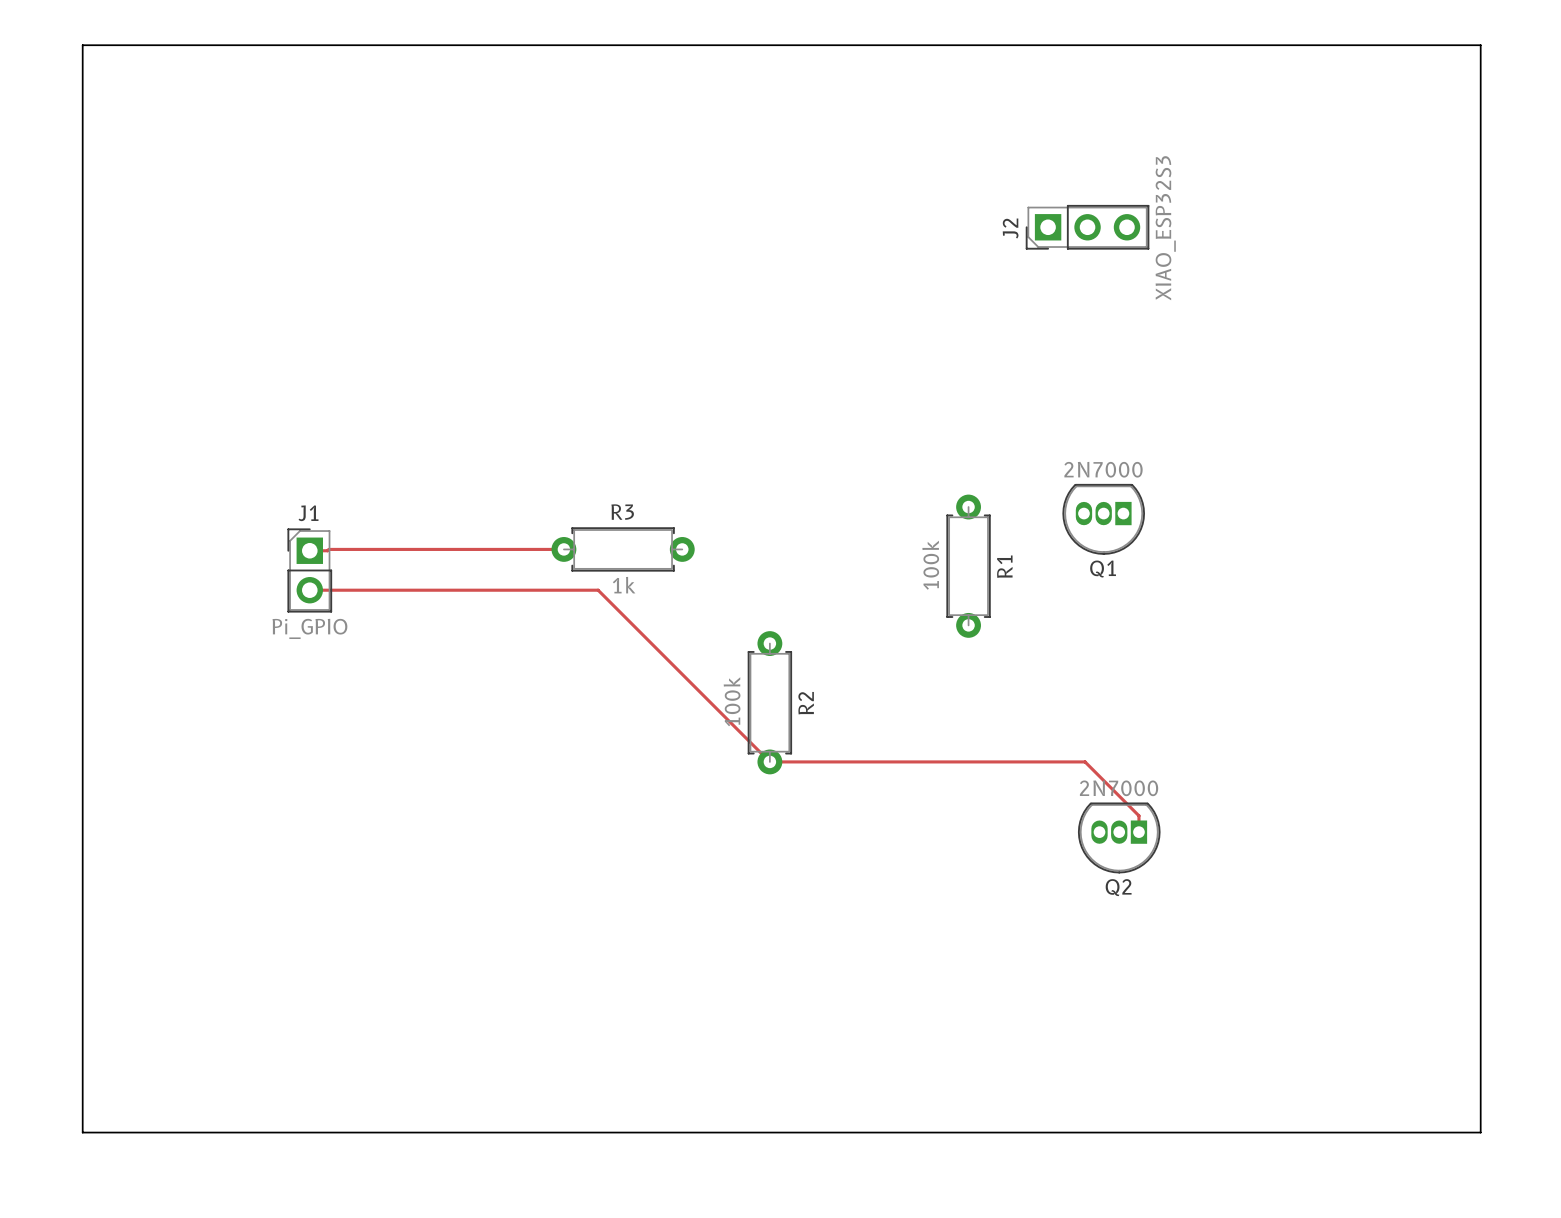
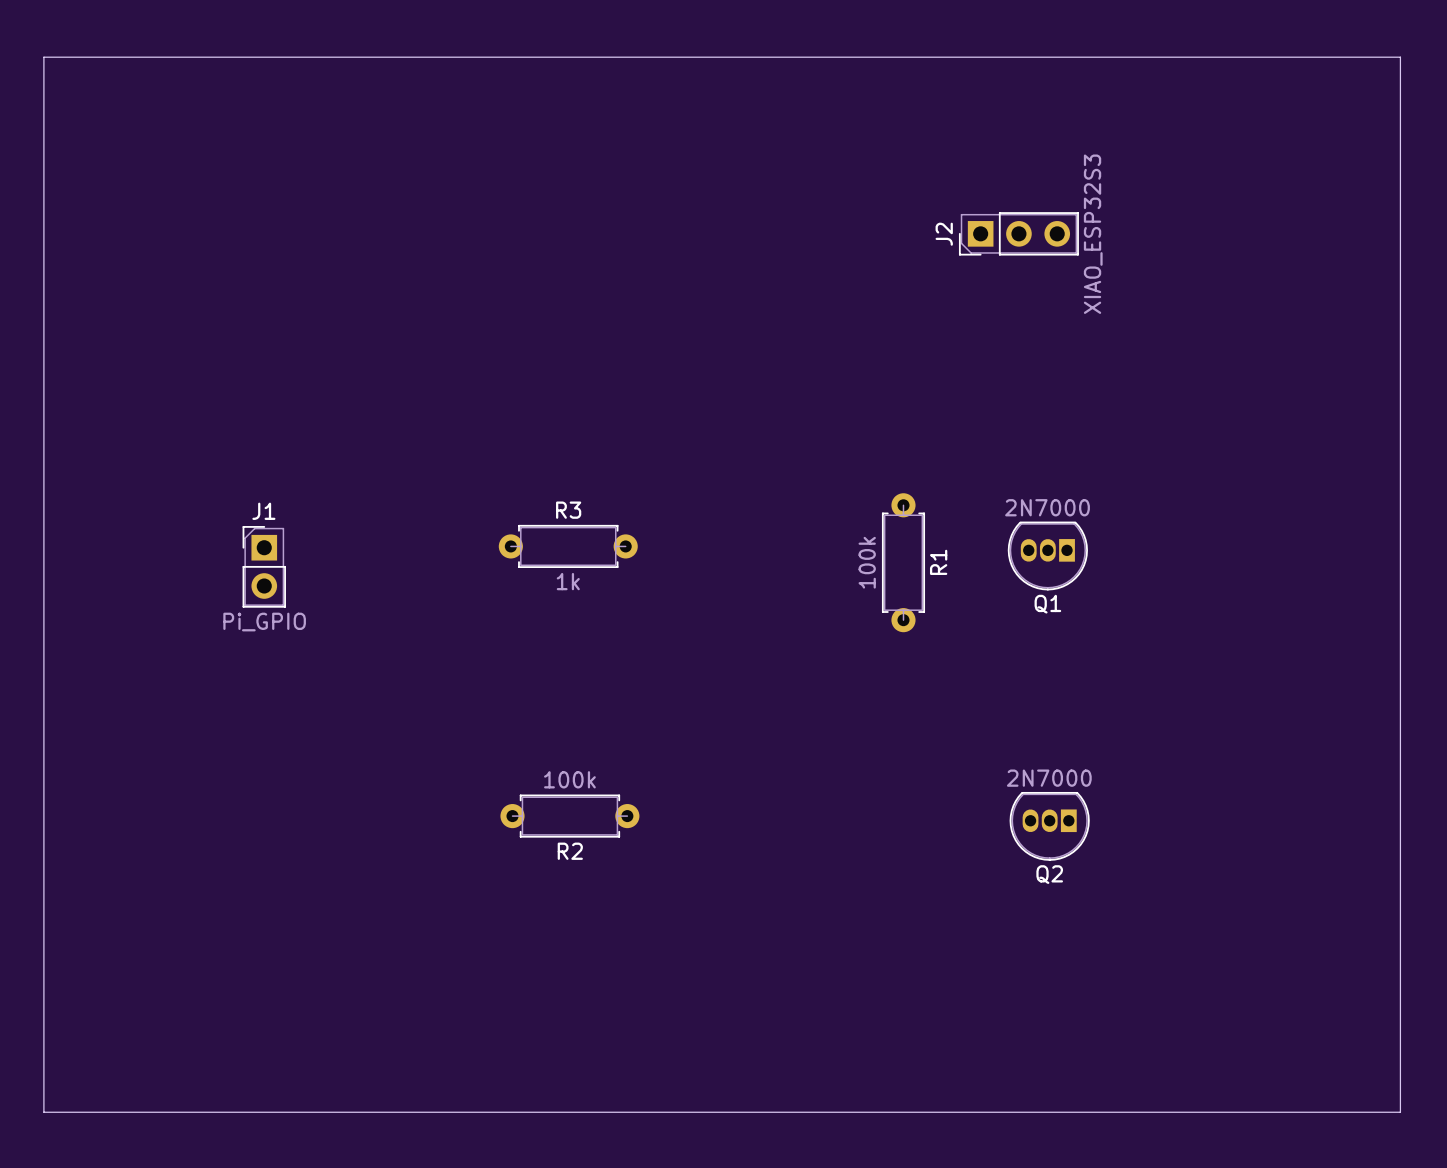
Q1 position: (1103, 519) -> (1047, 556)
track: (563, 549) (309, 550) -> none
track: (309, 590) (598, 590) (769, 761) (1085, 761) (1138, 815) (1138, 832) -> none
R2 rotation: 0° (769, 702) -> 90° clockwise (569, 816)
R2 position: (769, 702) -> (569, 816)

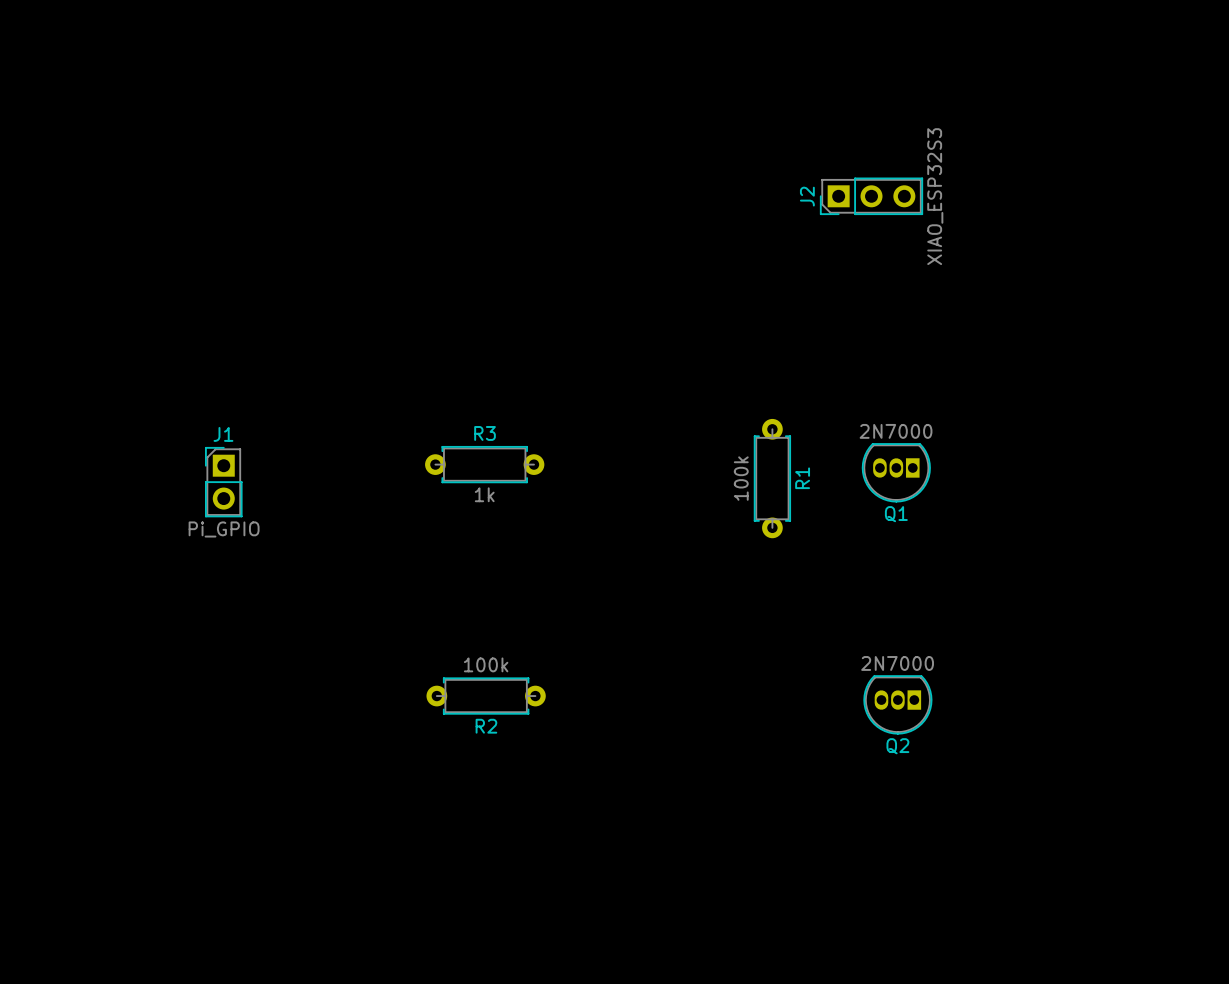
board edge: (43, 57) (1400, 57) (1400, 1112) (43, 1112) (43, 57) -> none

